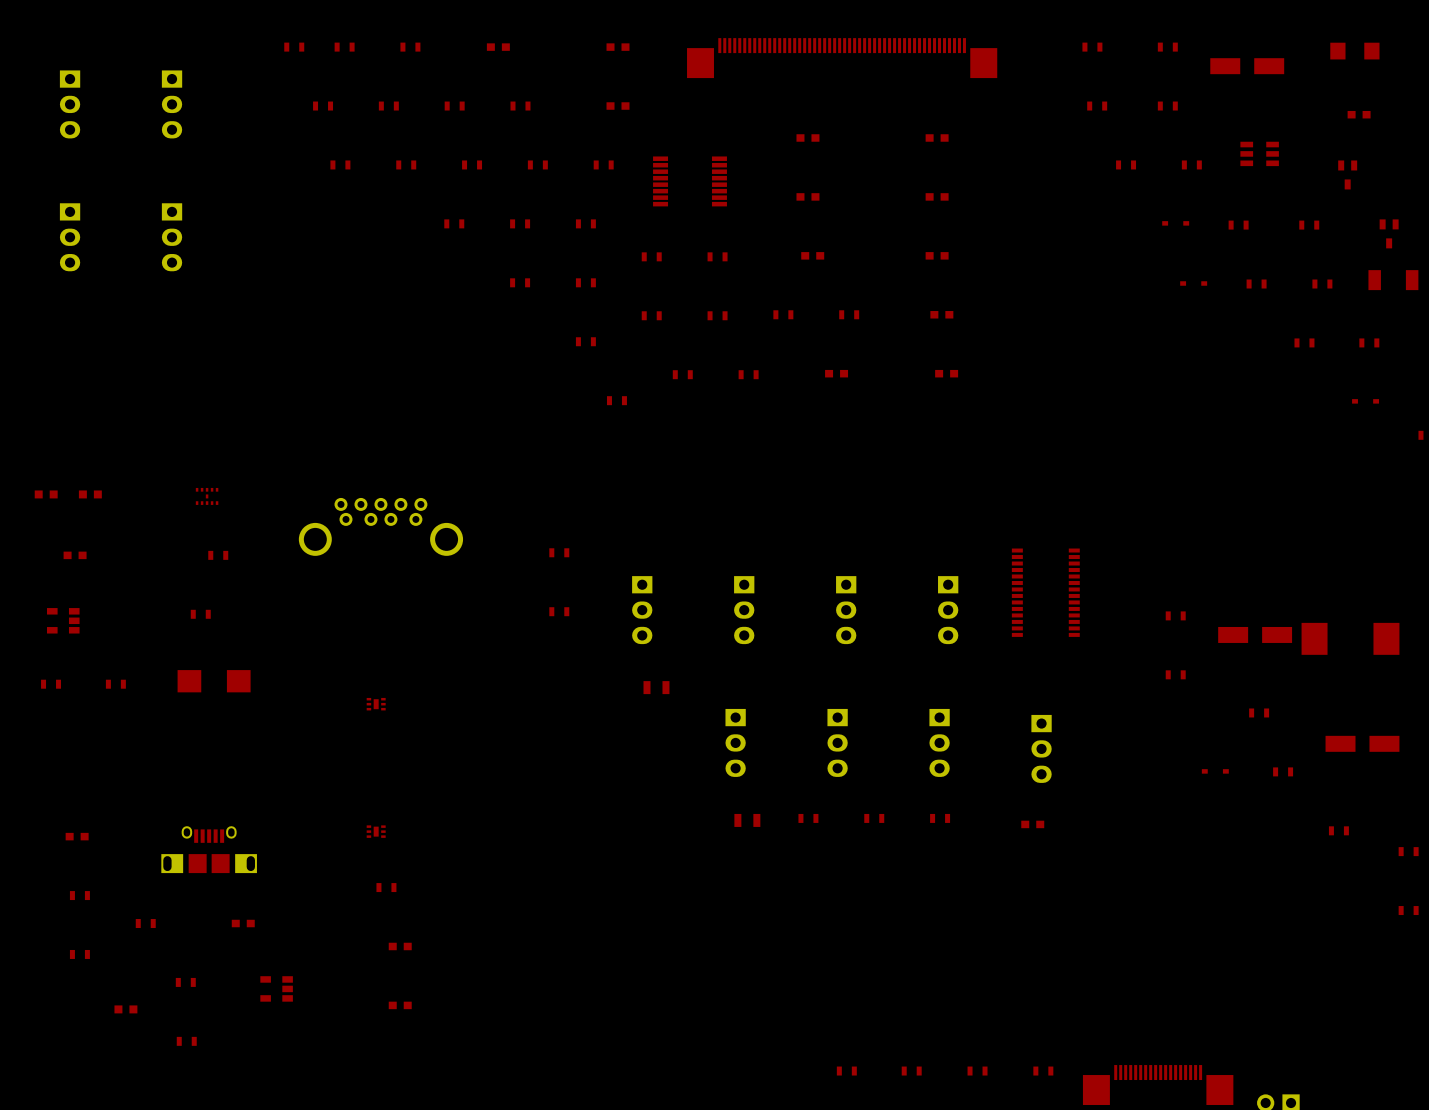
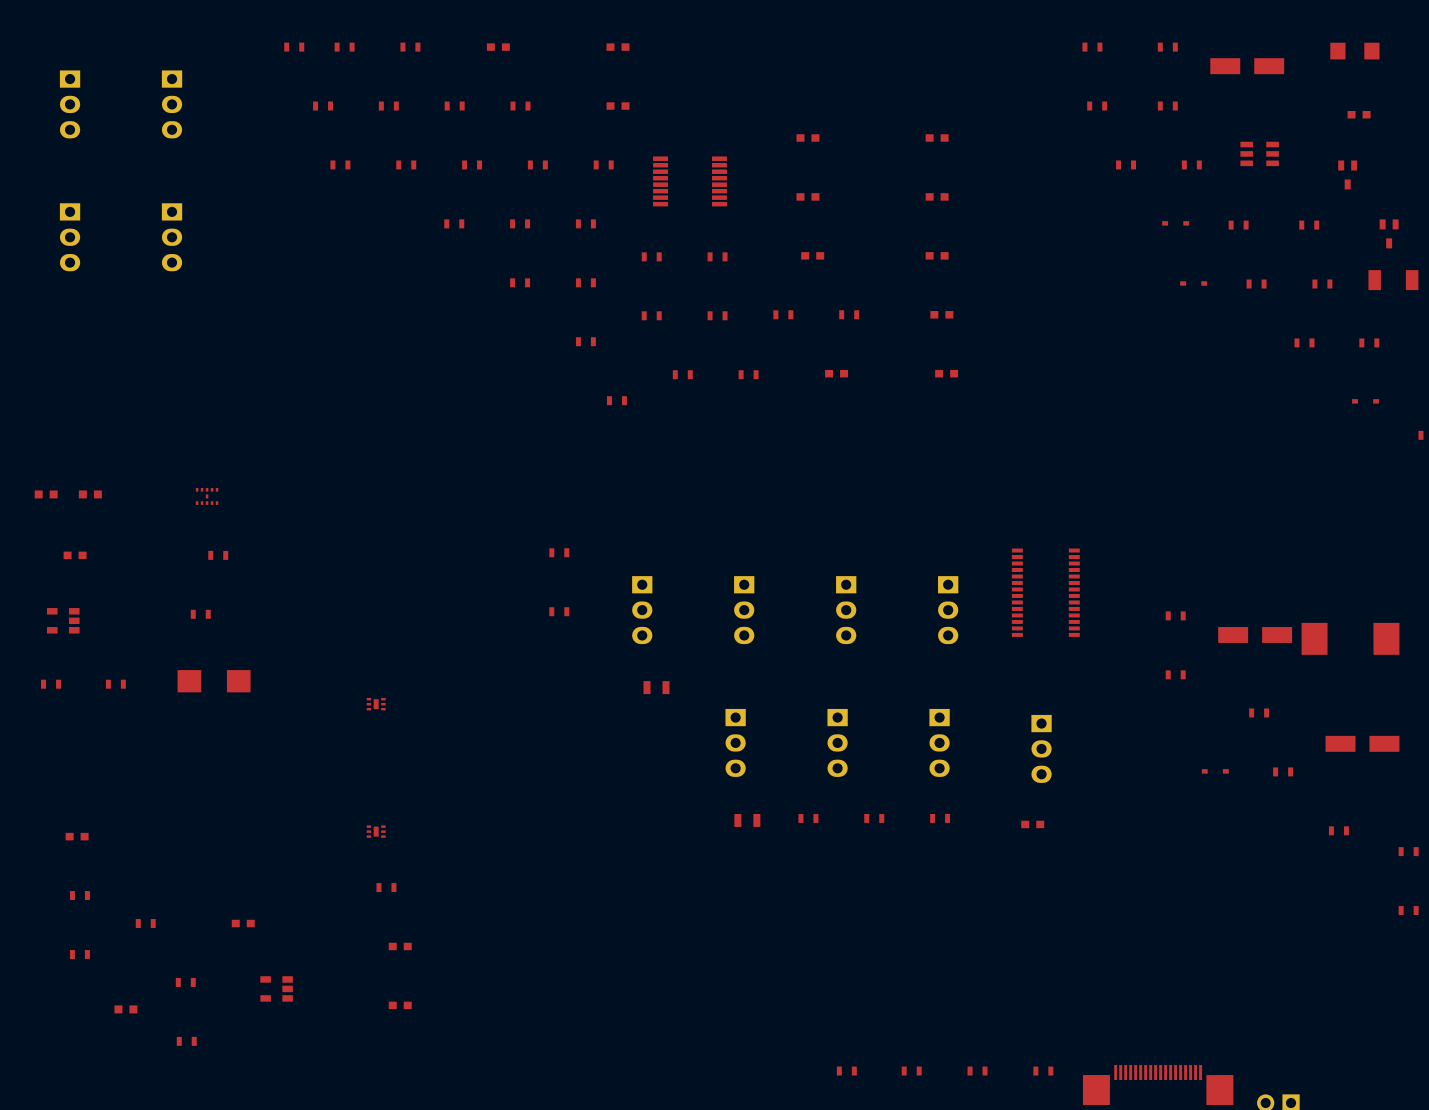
part: (842, 58) -> none
part: (380, 526) -> none
part: (209, 849) -> none

